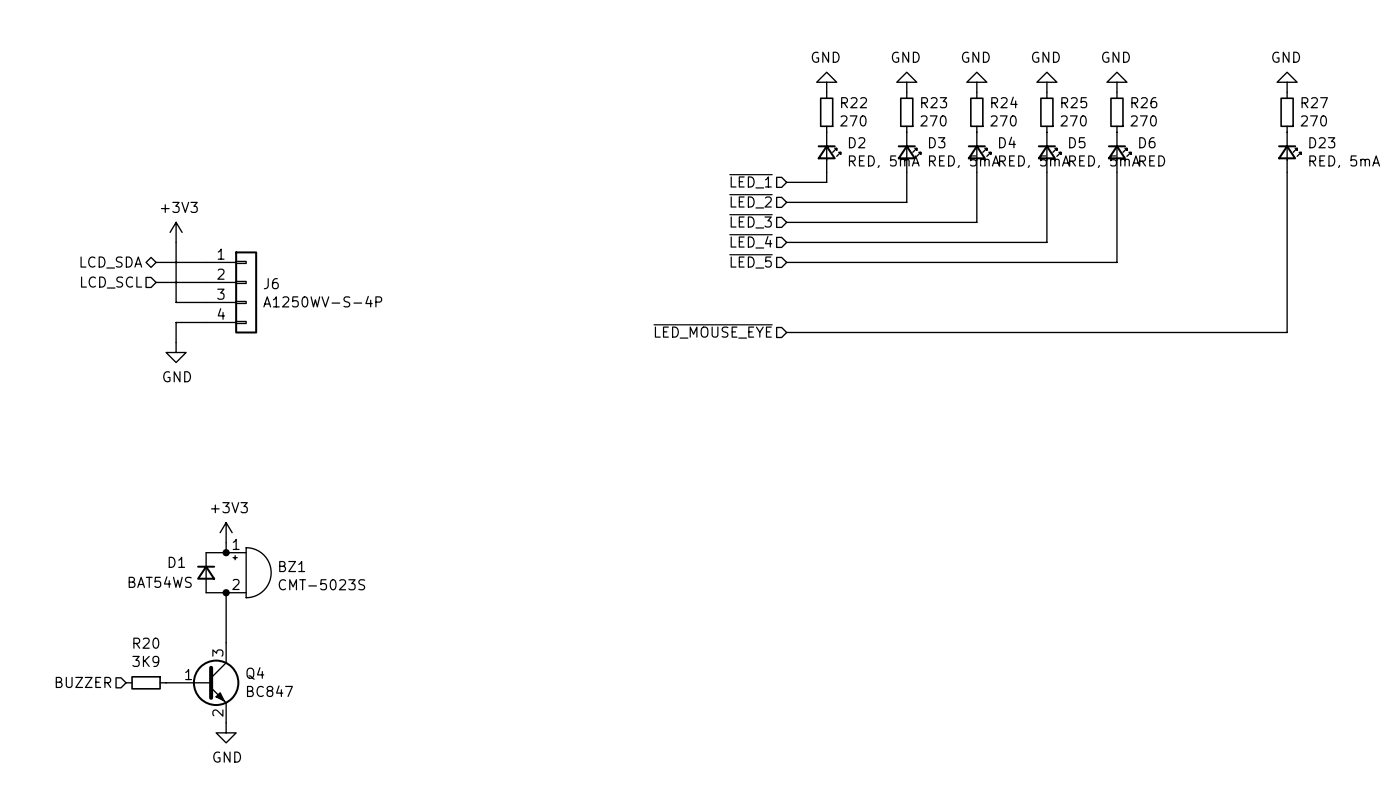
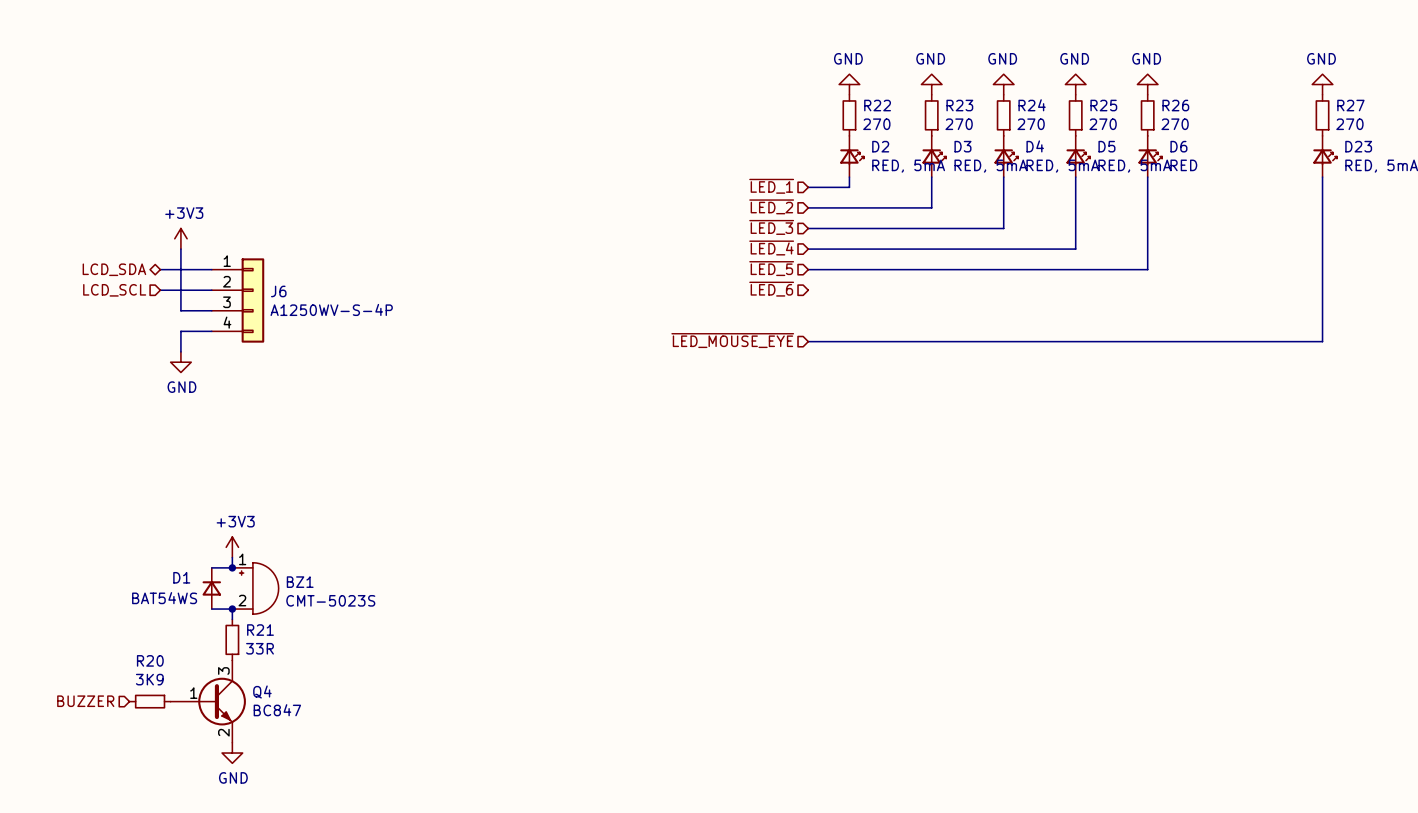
hierarchical label: none -> ~{LED_6} (771, 289)
wire: (226, 602) (226, 642) -> none
R21: none -> 33R (232, 639)

